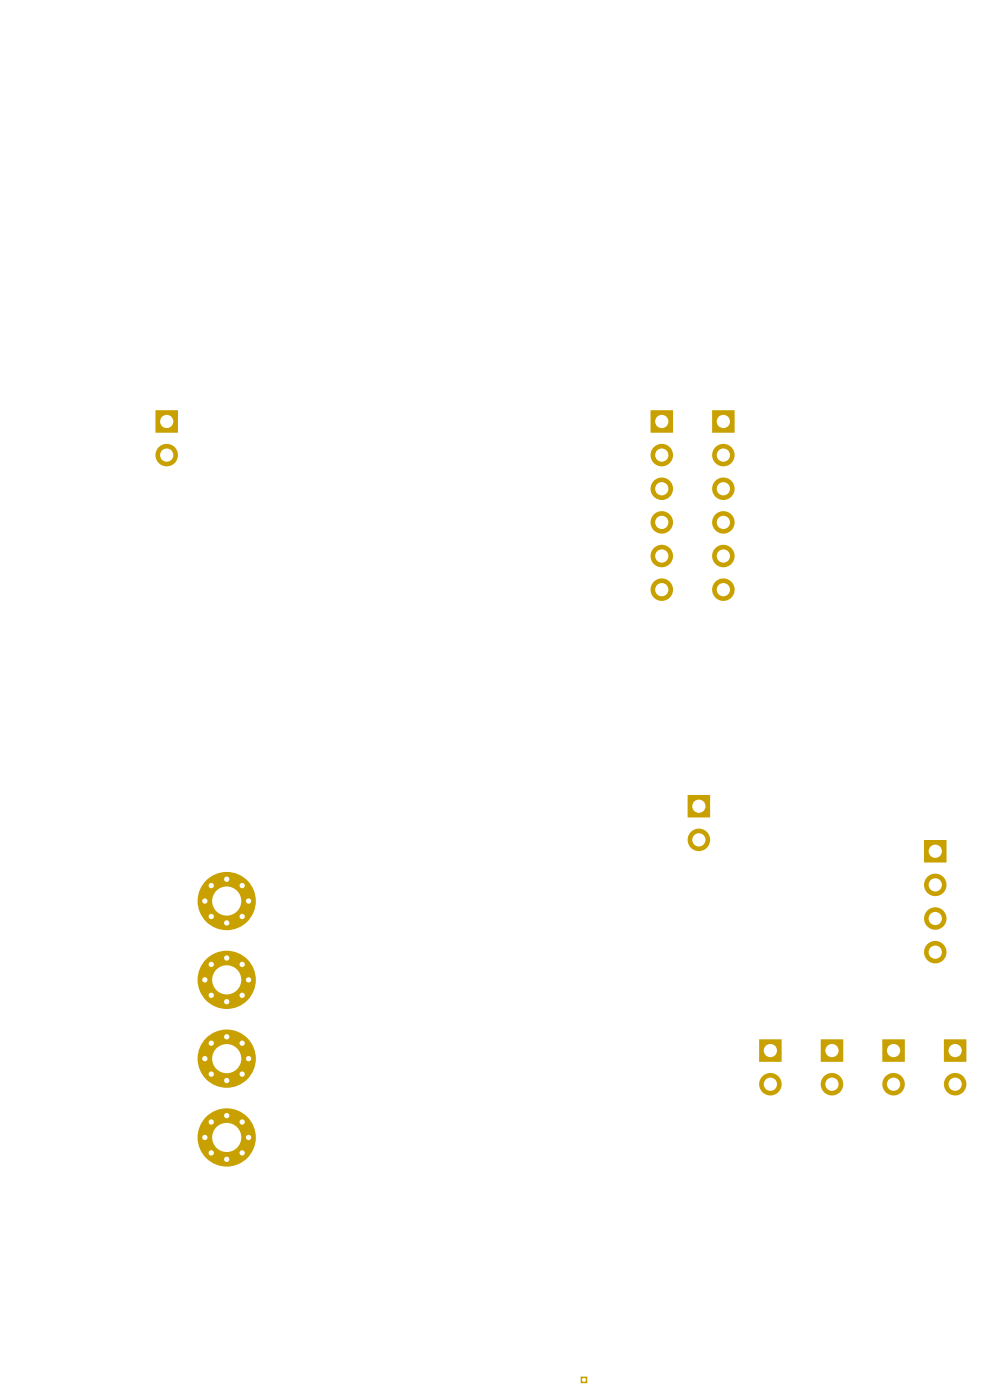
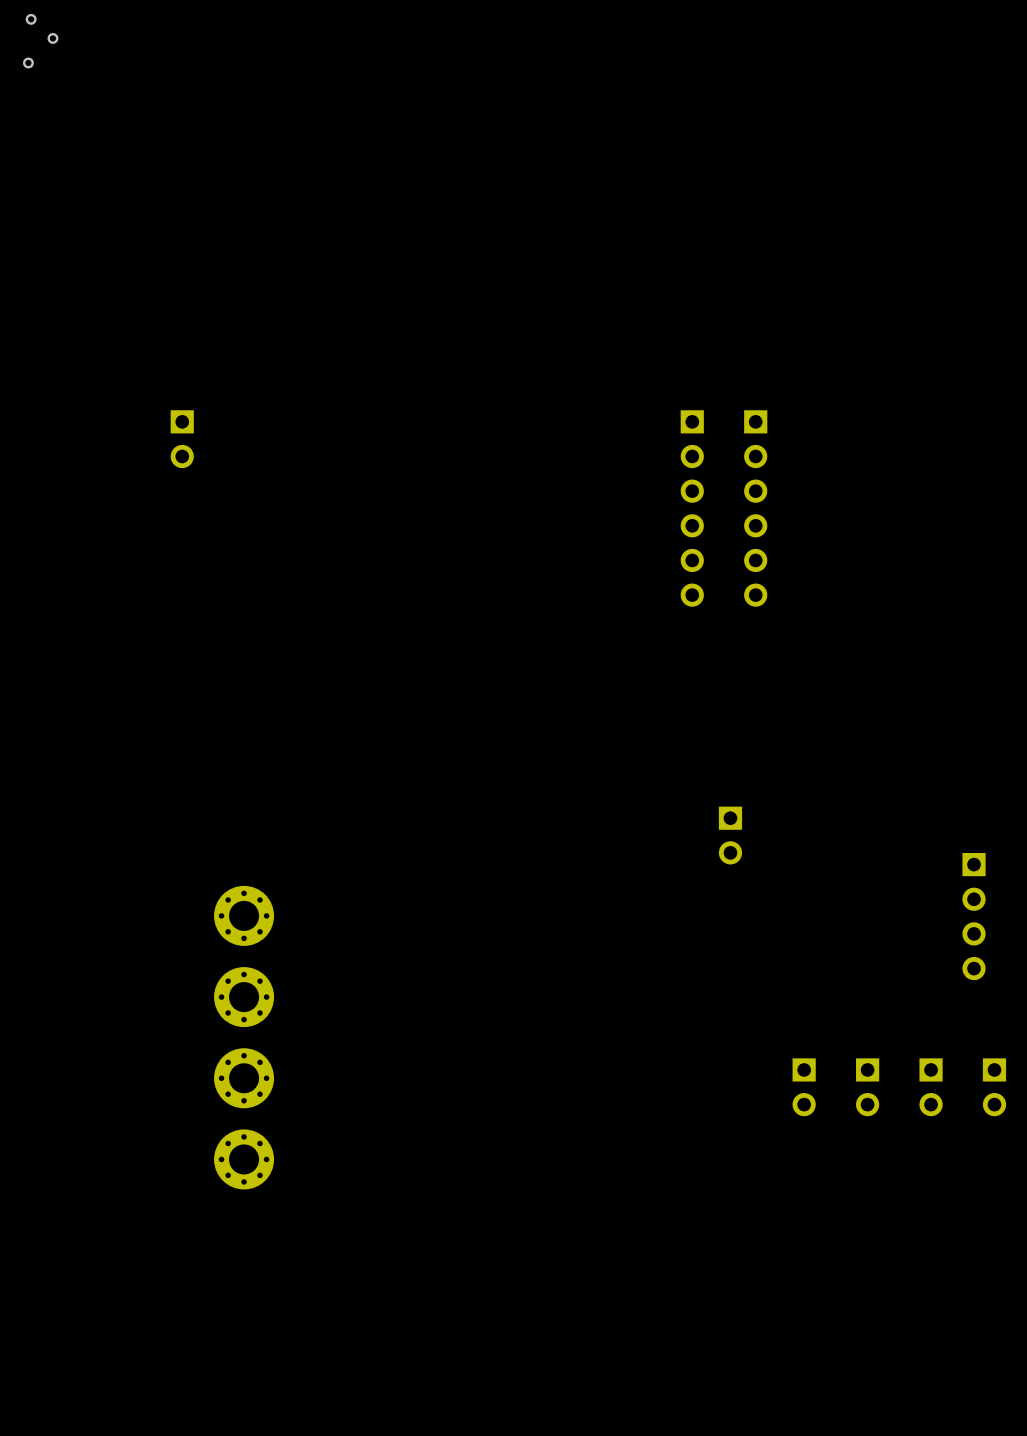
via: none -> (31, 19)
via: none -> (52, 38)
via: none -> (28, 62)
part: (583, 1379) -> none

